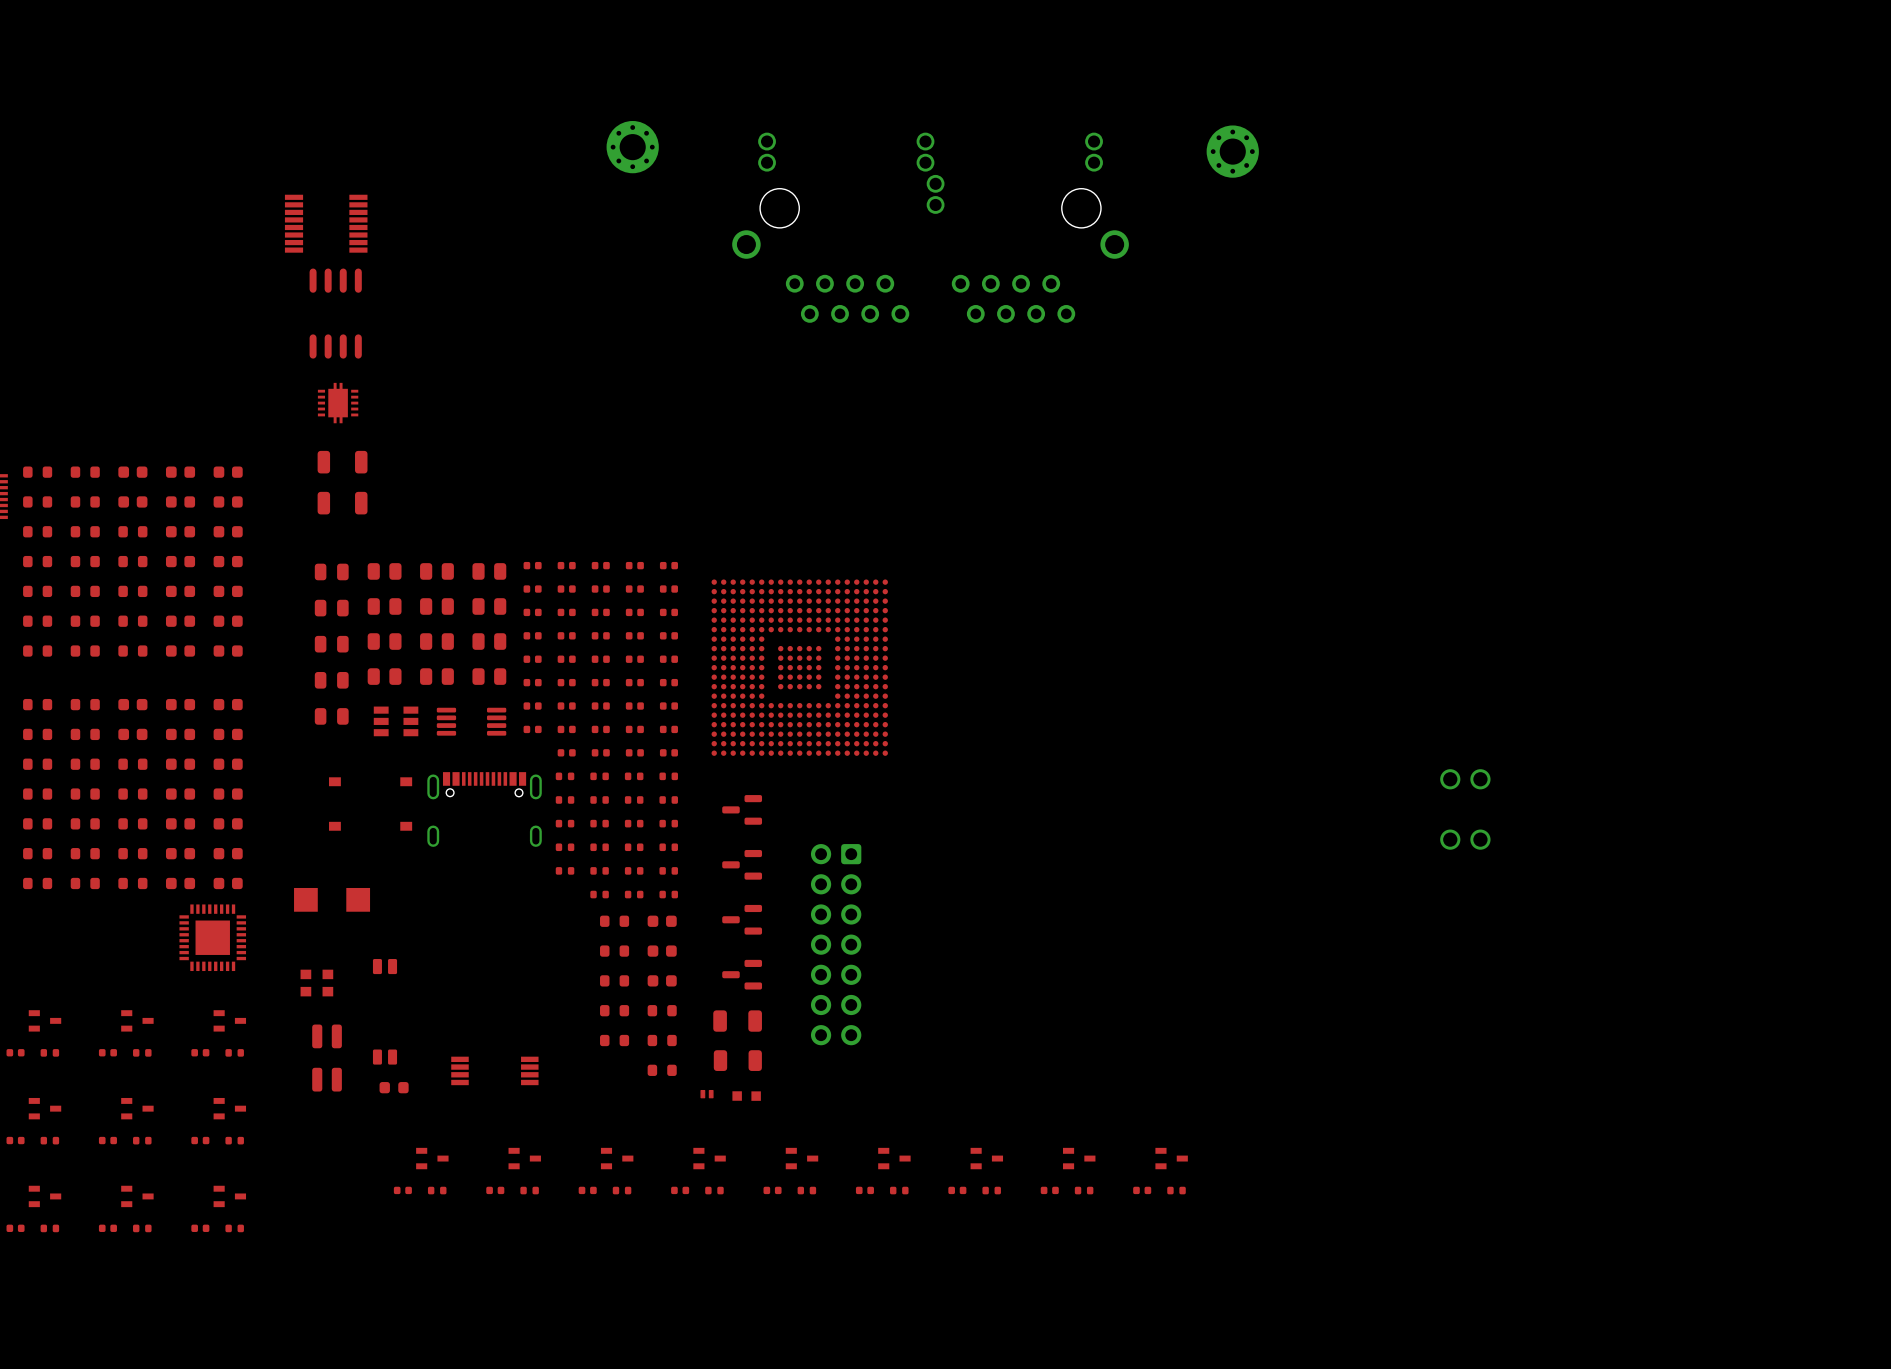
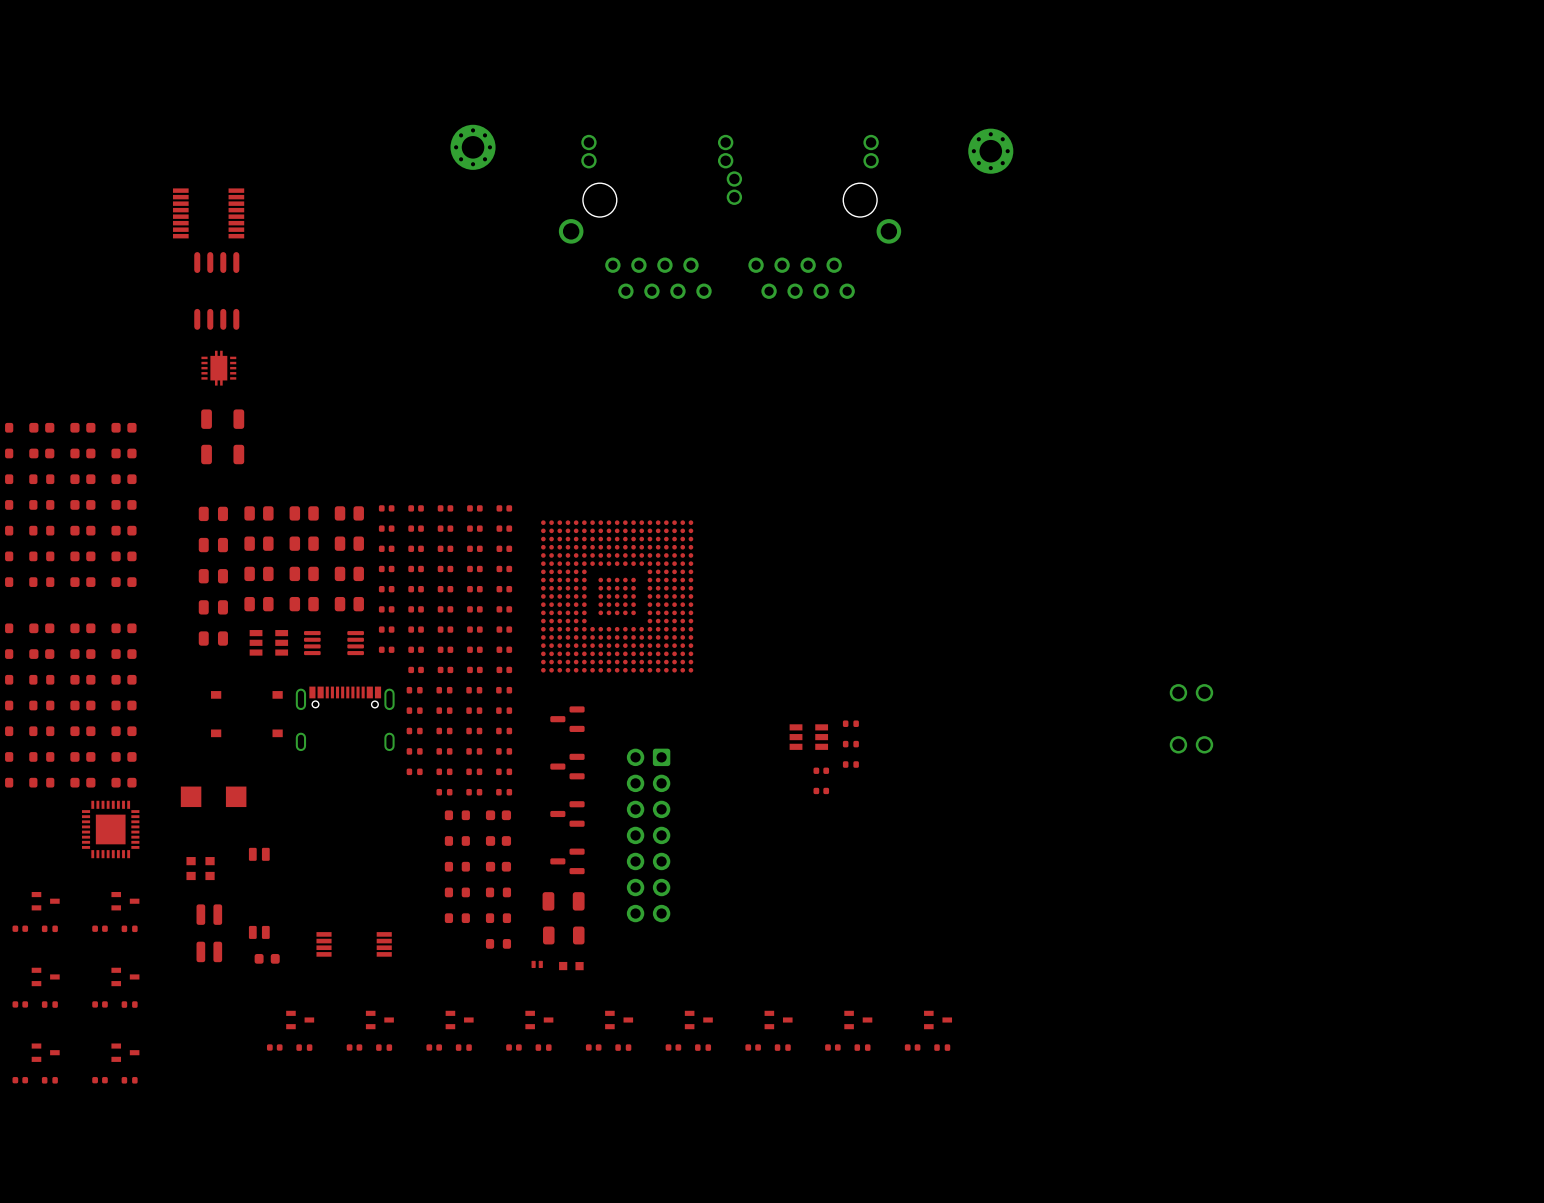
part: none -> (850, 723)
part: none -> (808, 737)
part: none -> (850, 744)
part: none -> (850, 764)
part: none -> (821, 770)
part: none -> (821, 790)

